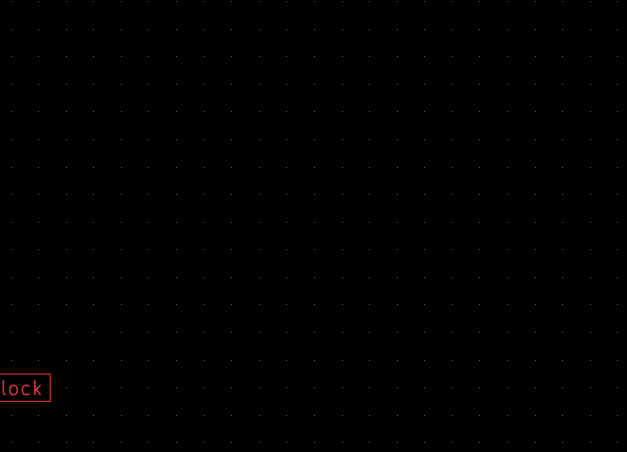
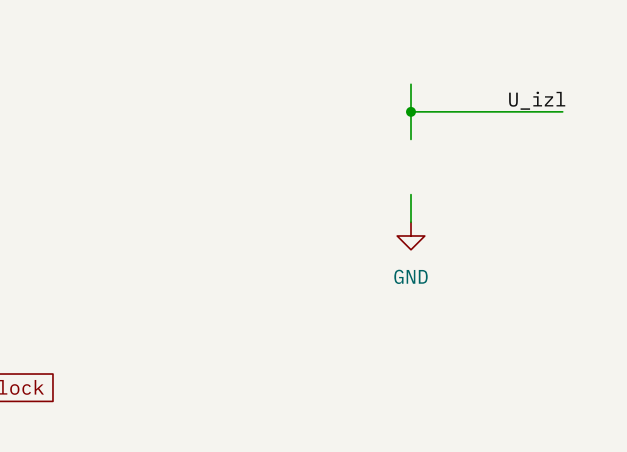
wire: none -> (411, 84) (411, 139)
label: none -> U_izl (537, 100)
wire: none -> (411, 111) (562, 111)
junction: none -> (411, 111)
wire: none -> (411, 194) (411, 222)
power symbol: none -> GND (411, 235)

